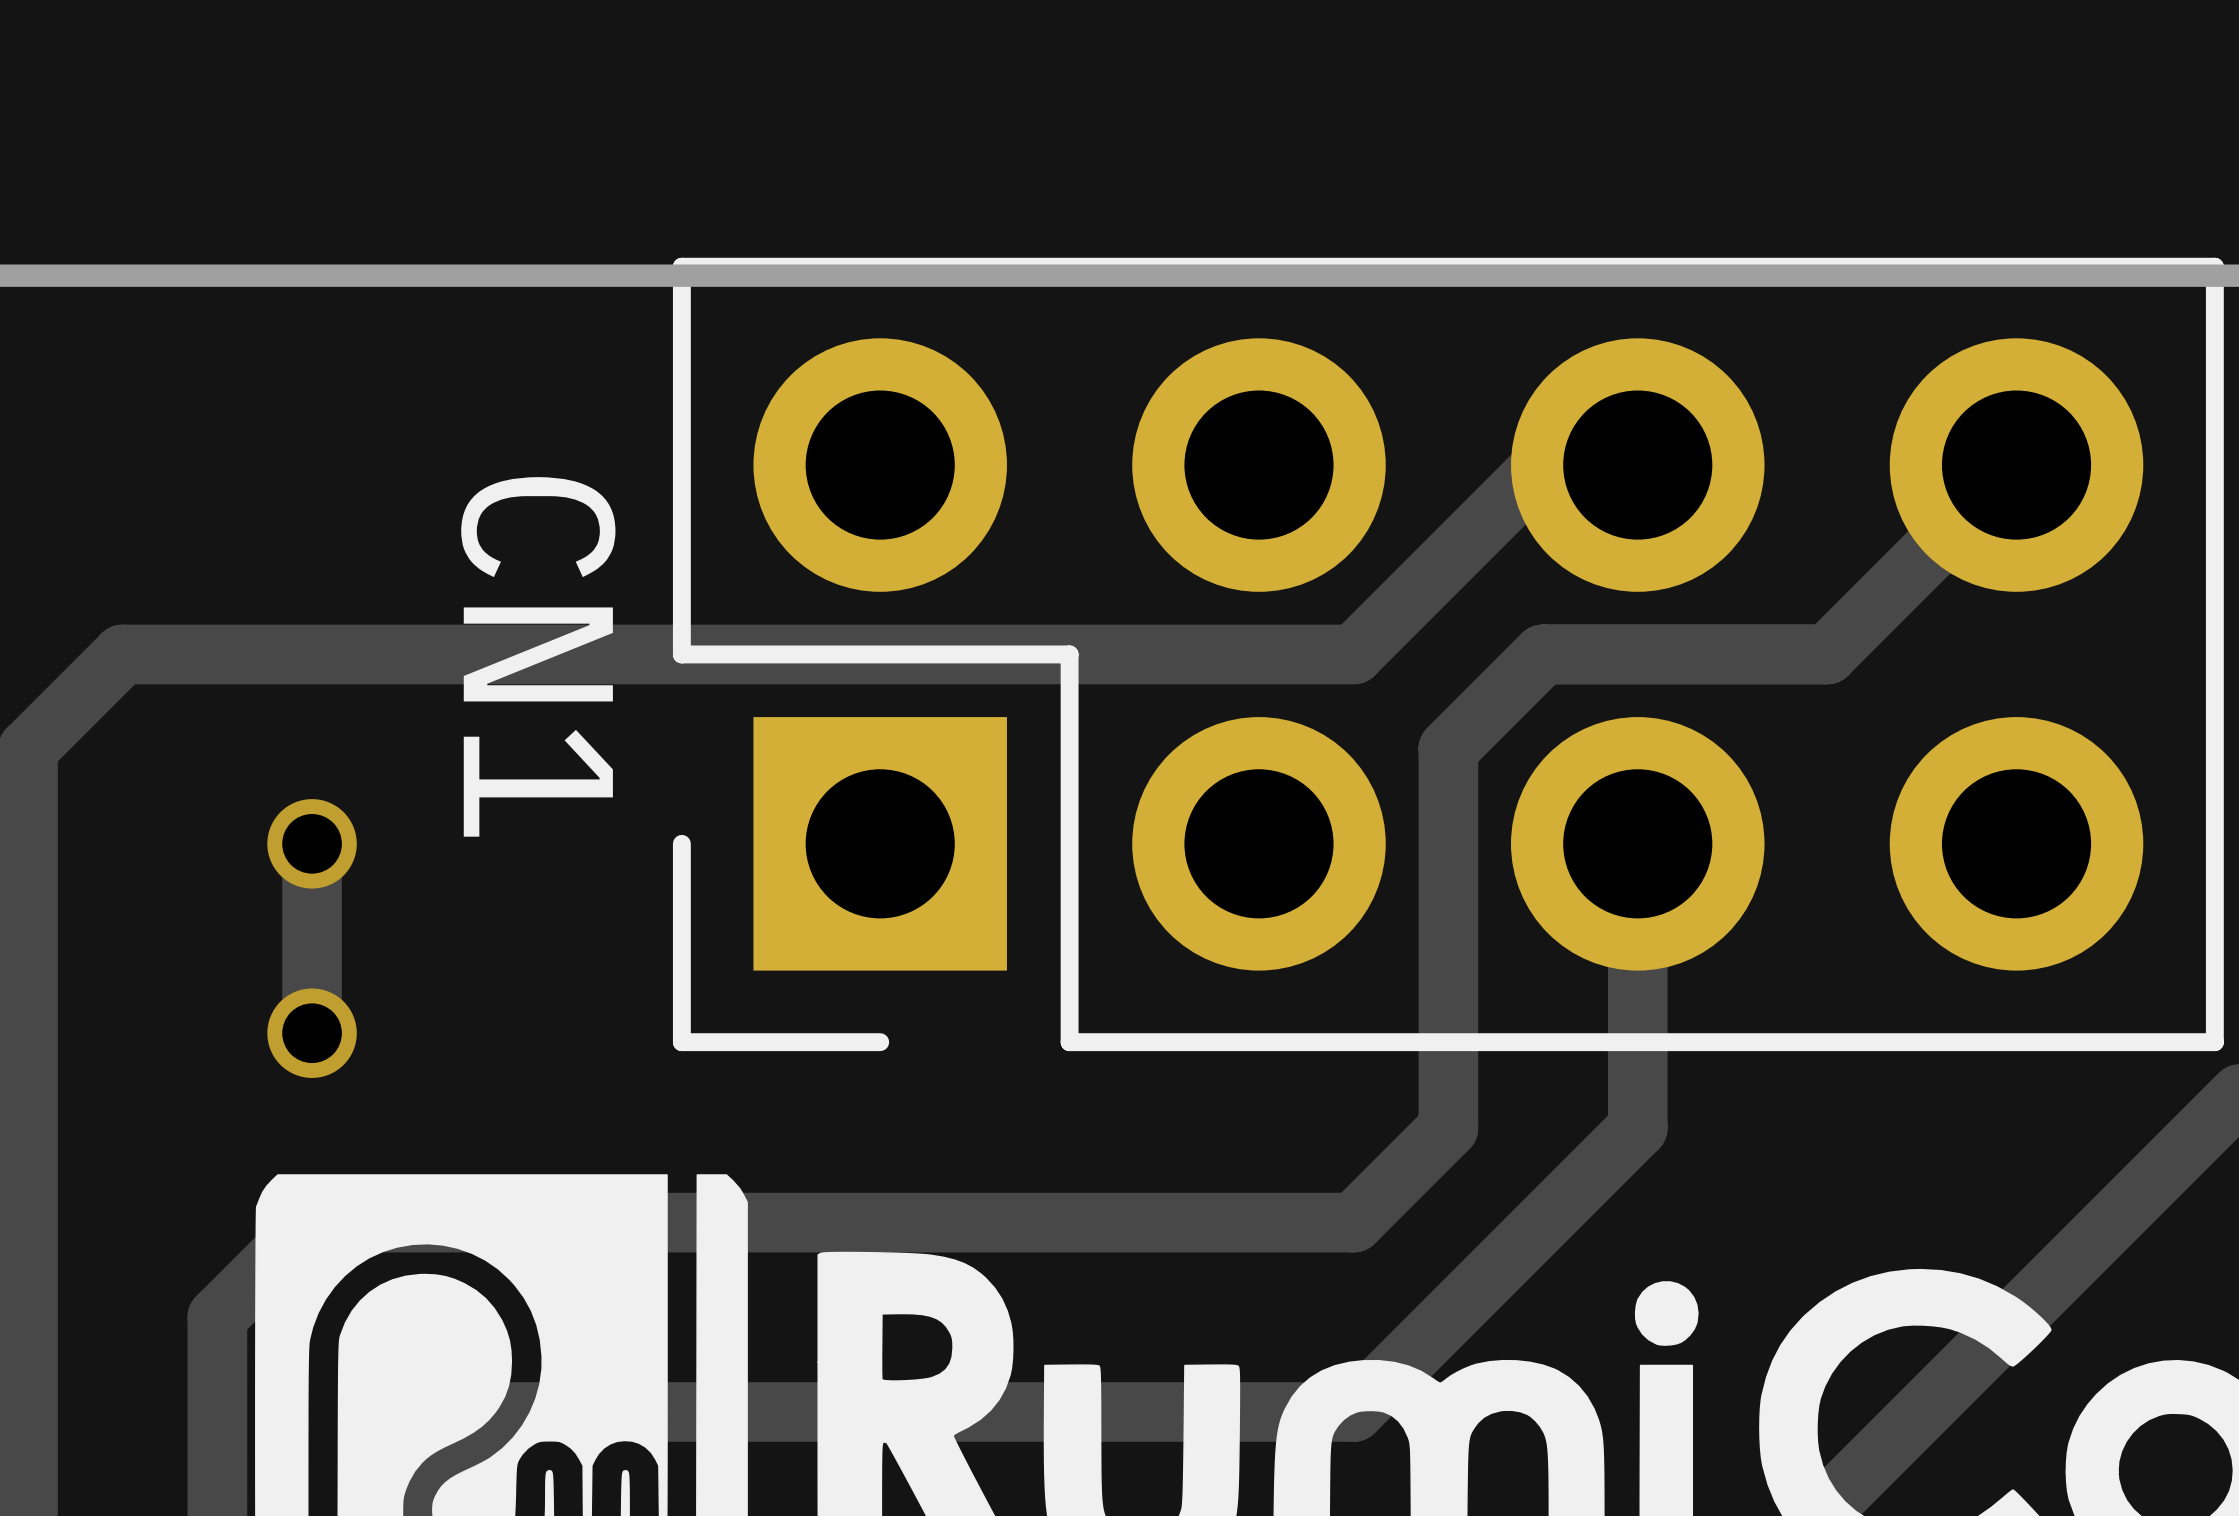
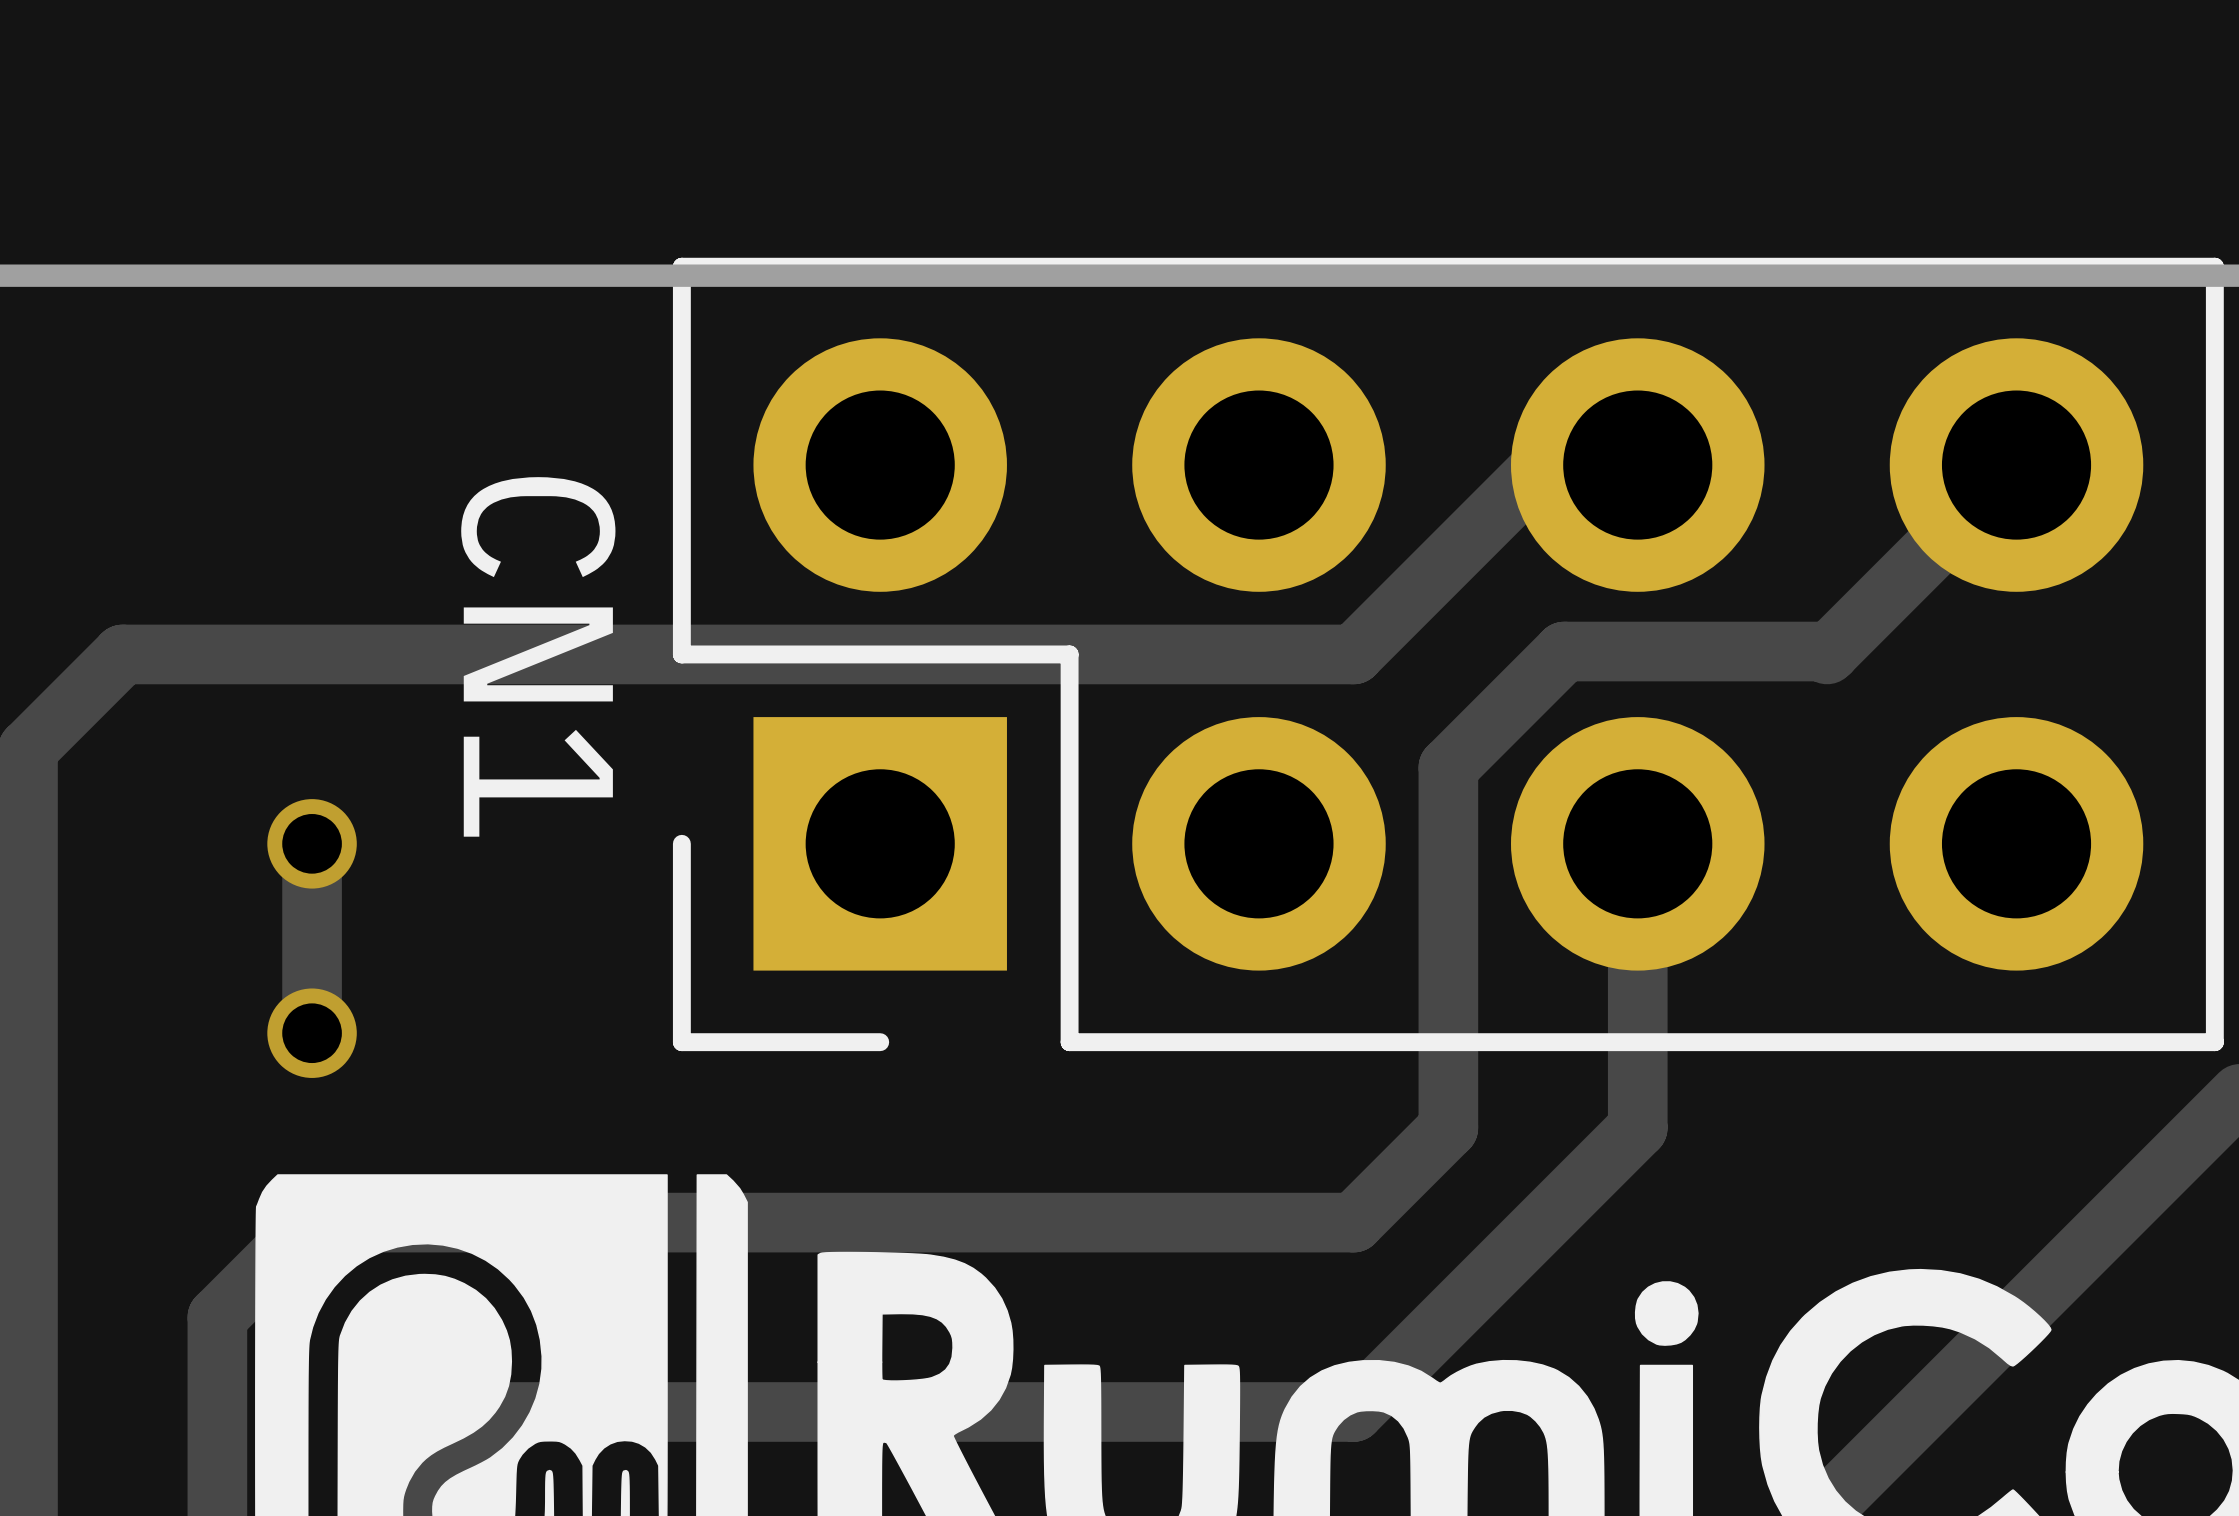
track: (1827, 654) (1543, 654) (1448, 749) (1448, 767) -> (1830, 651) (1564, 651) (1448, 767)

